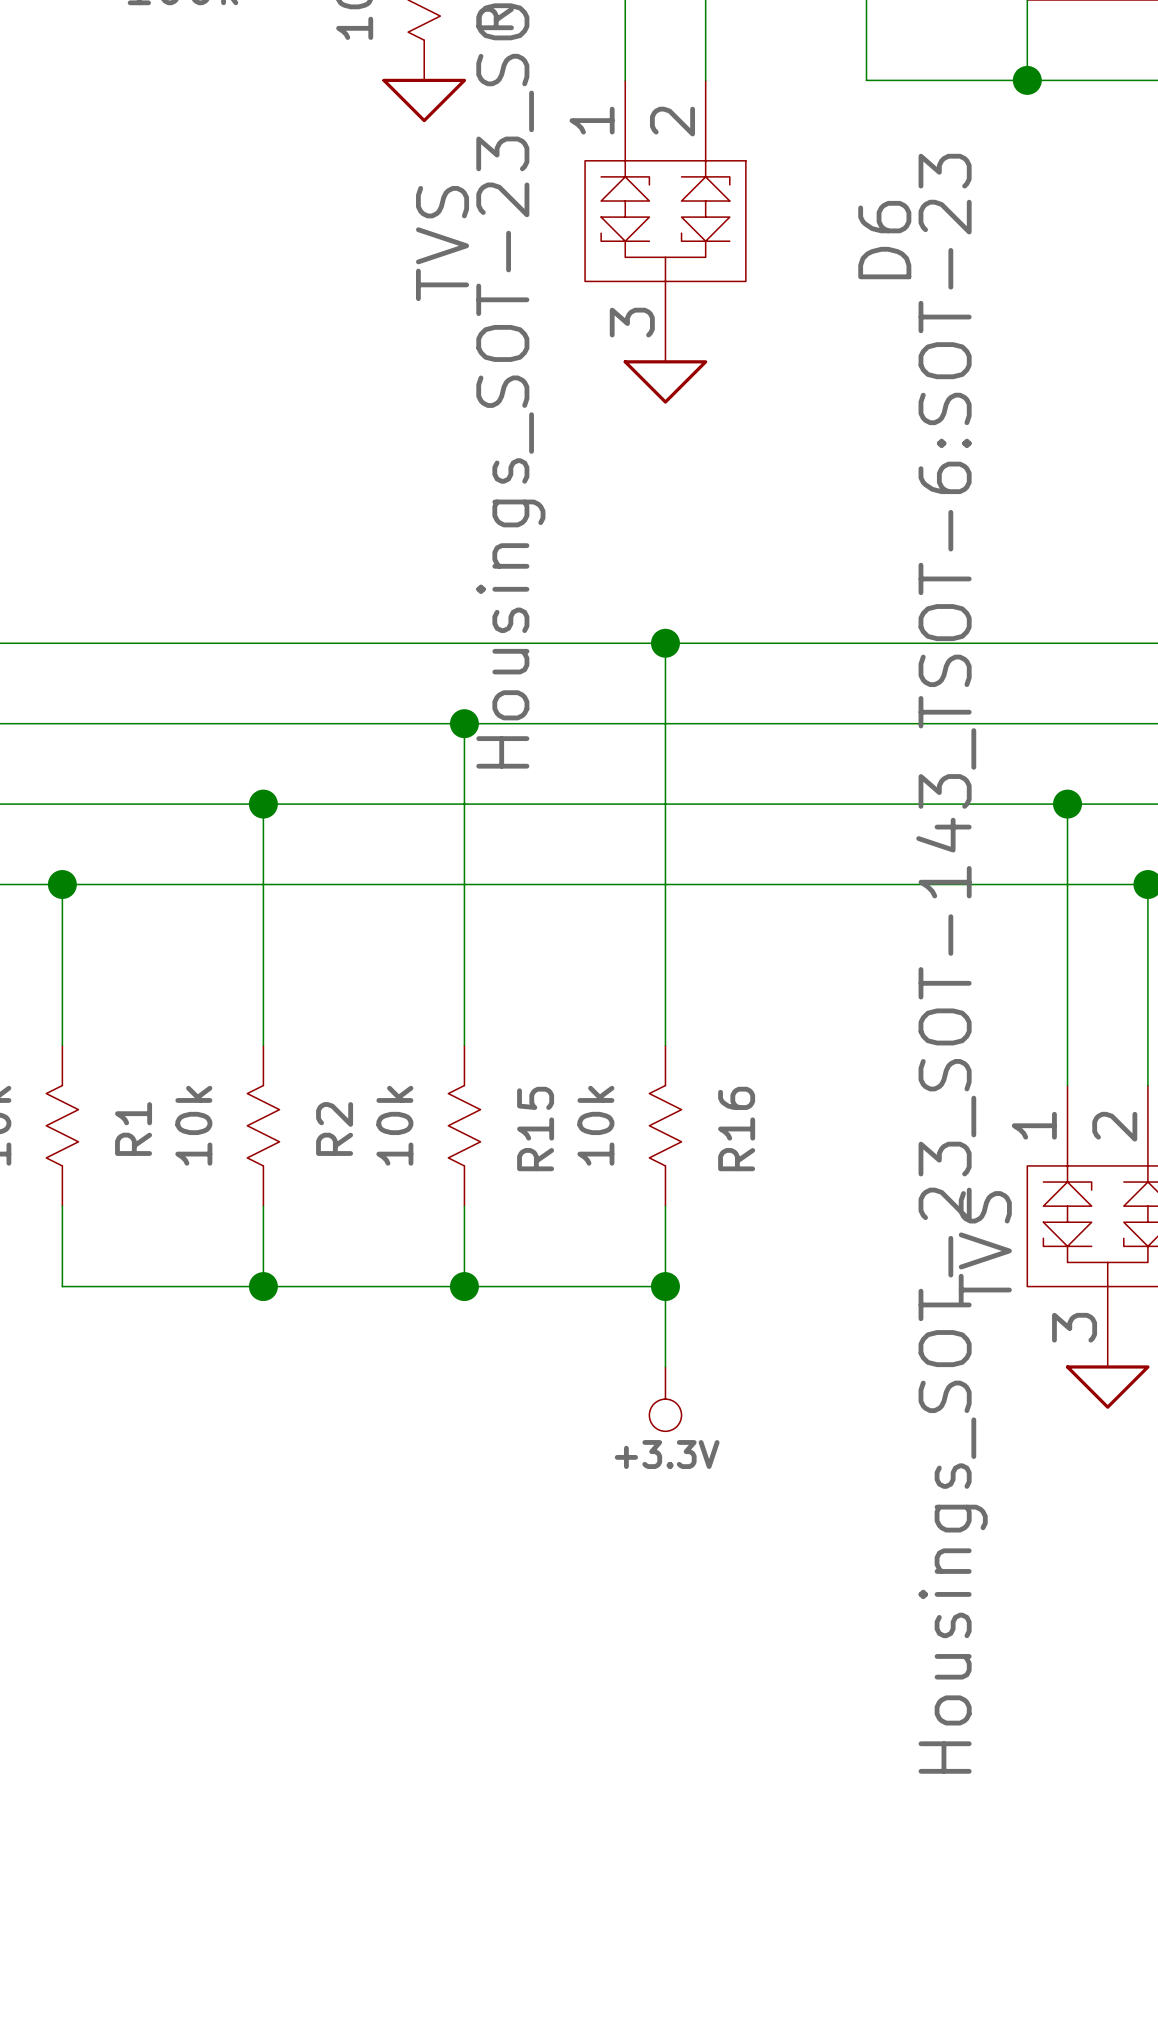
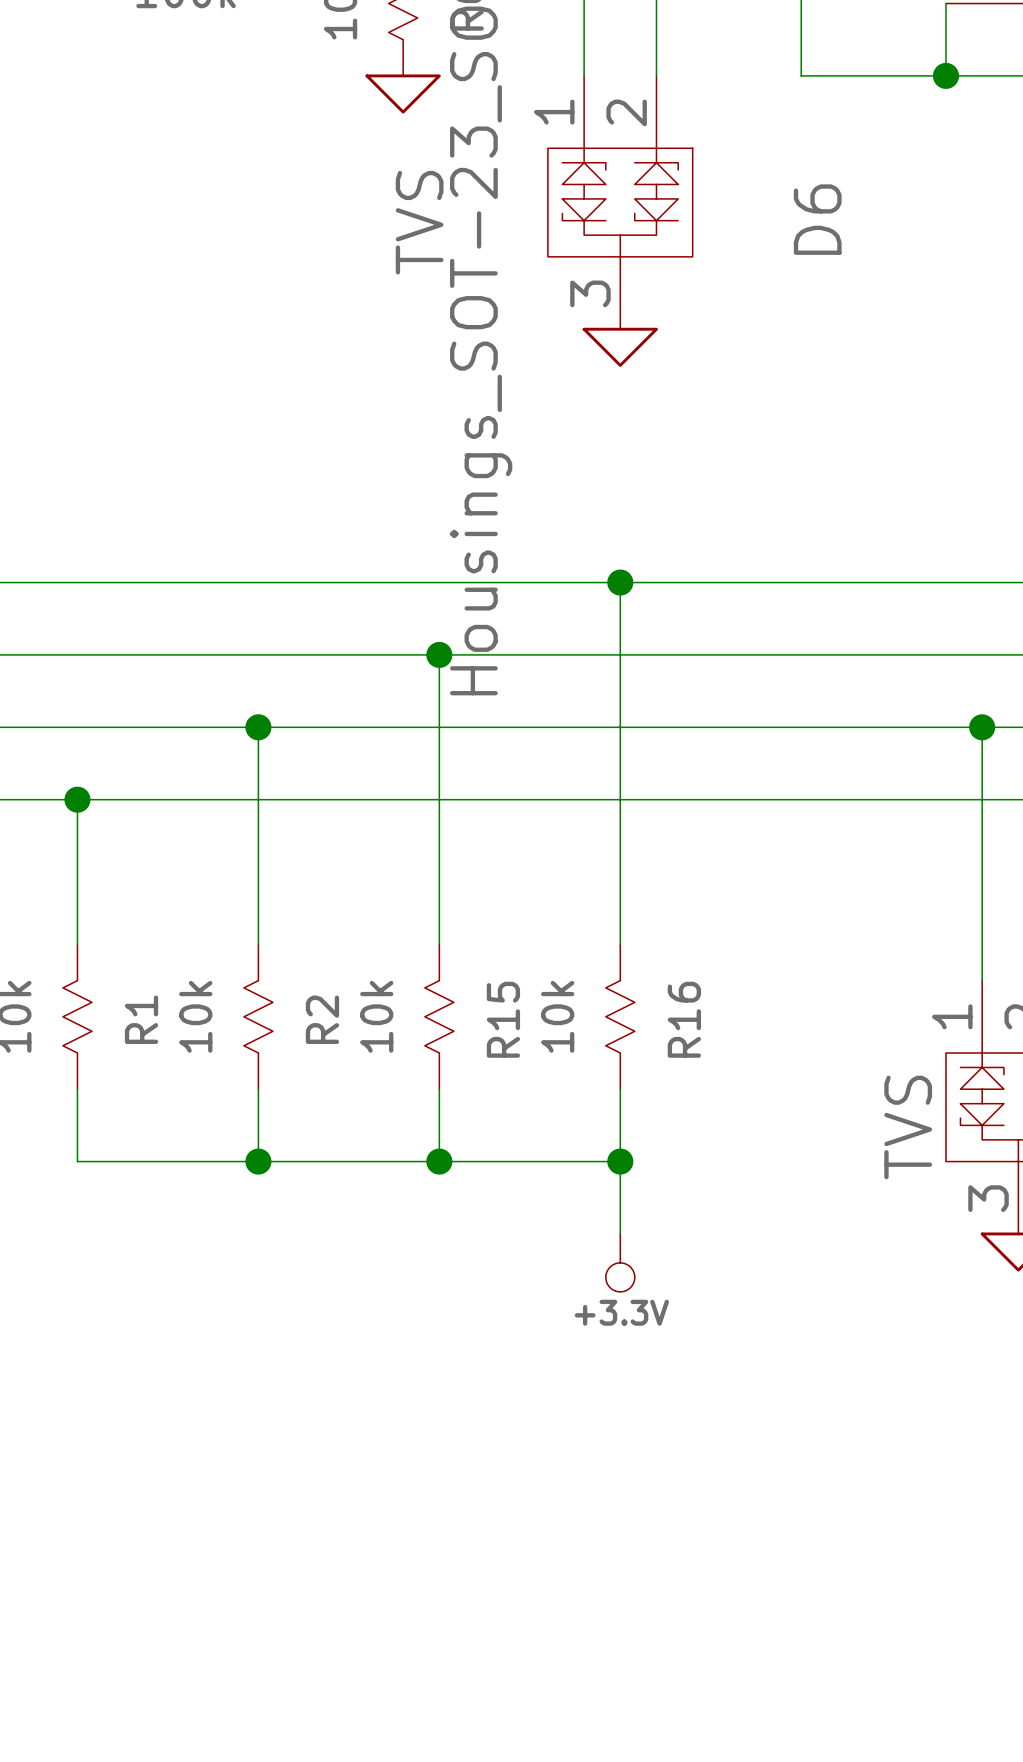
part text: Housings_SOT-23_SOT-143_TSOT-6:SOT-23 (951, 963) -> none

